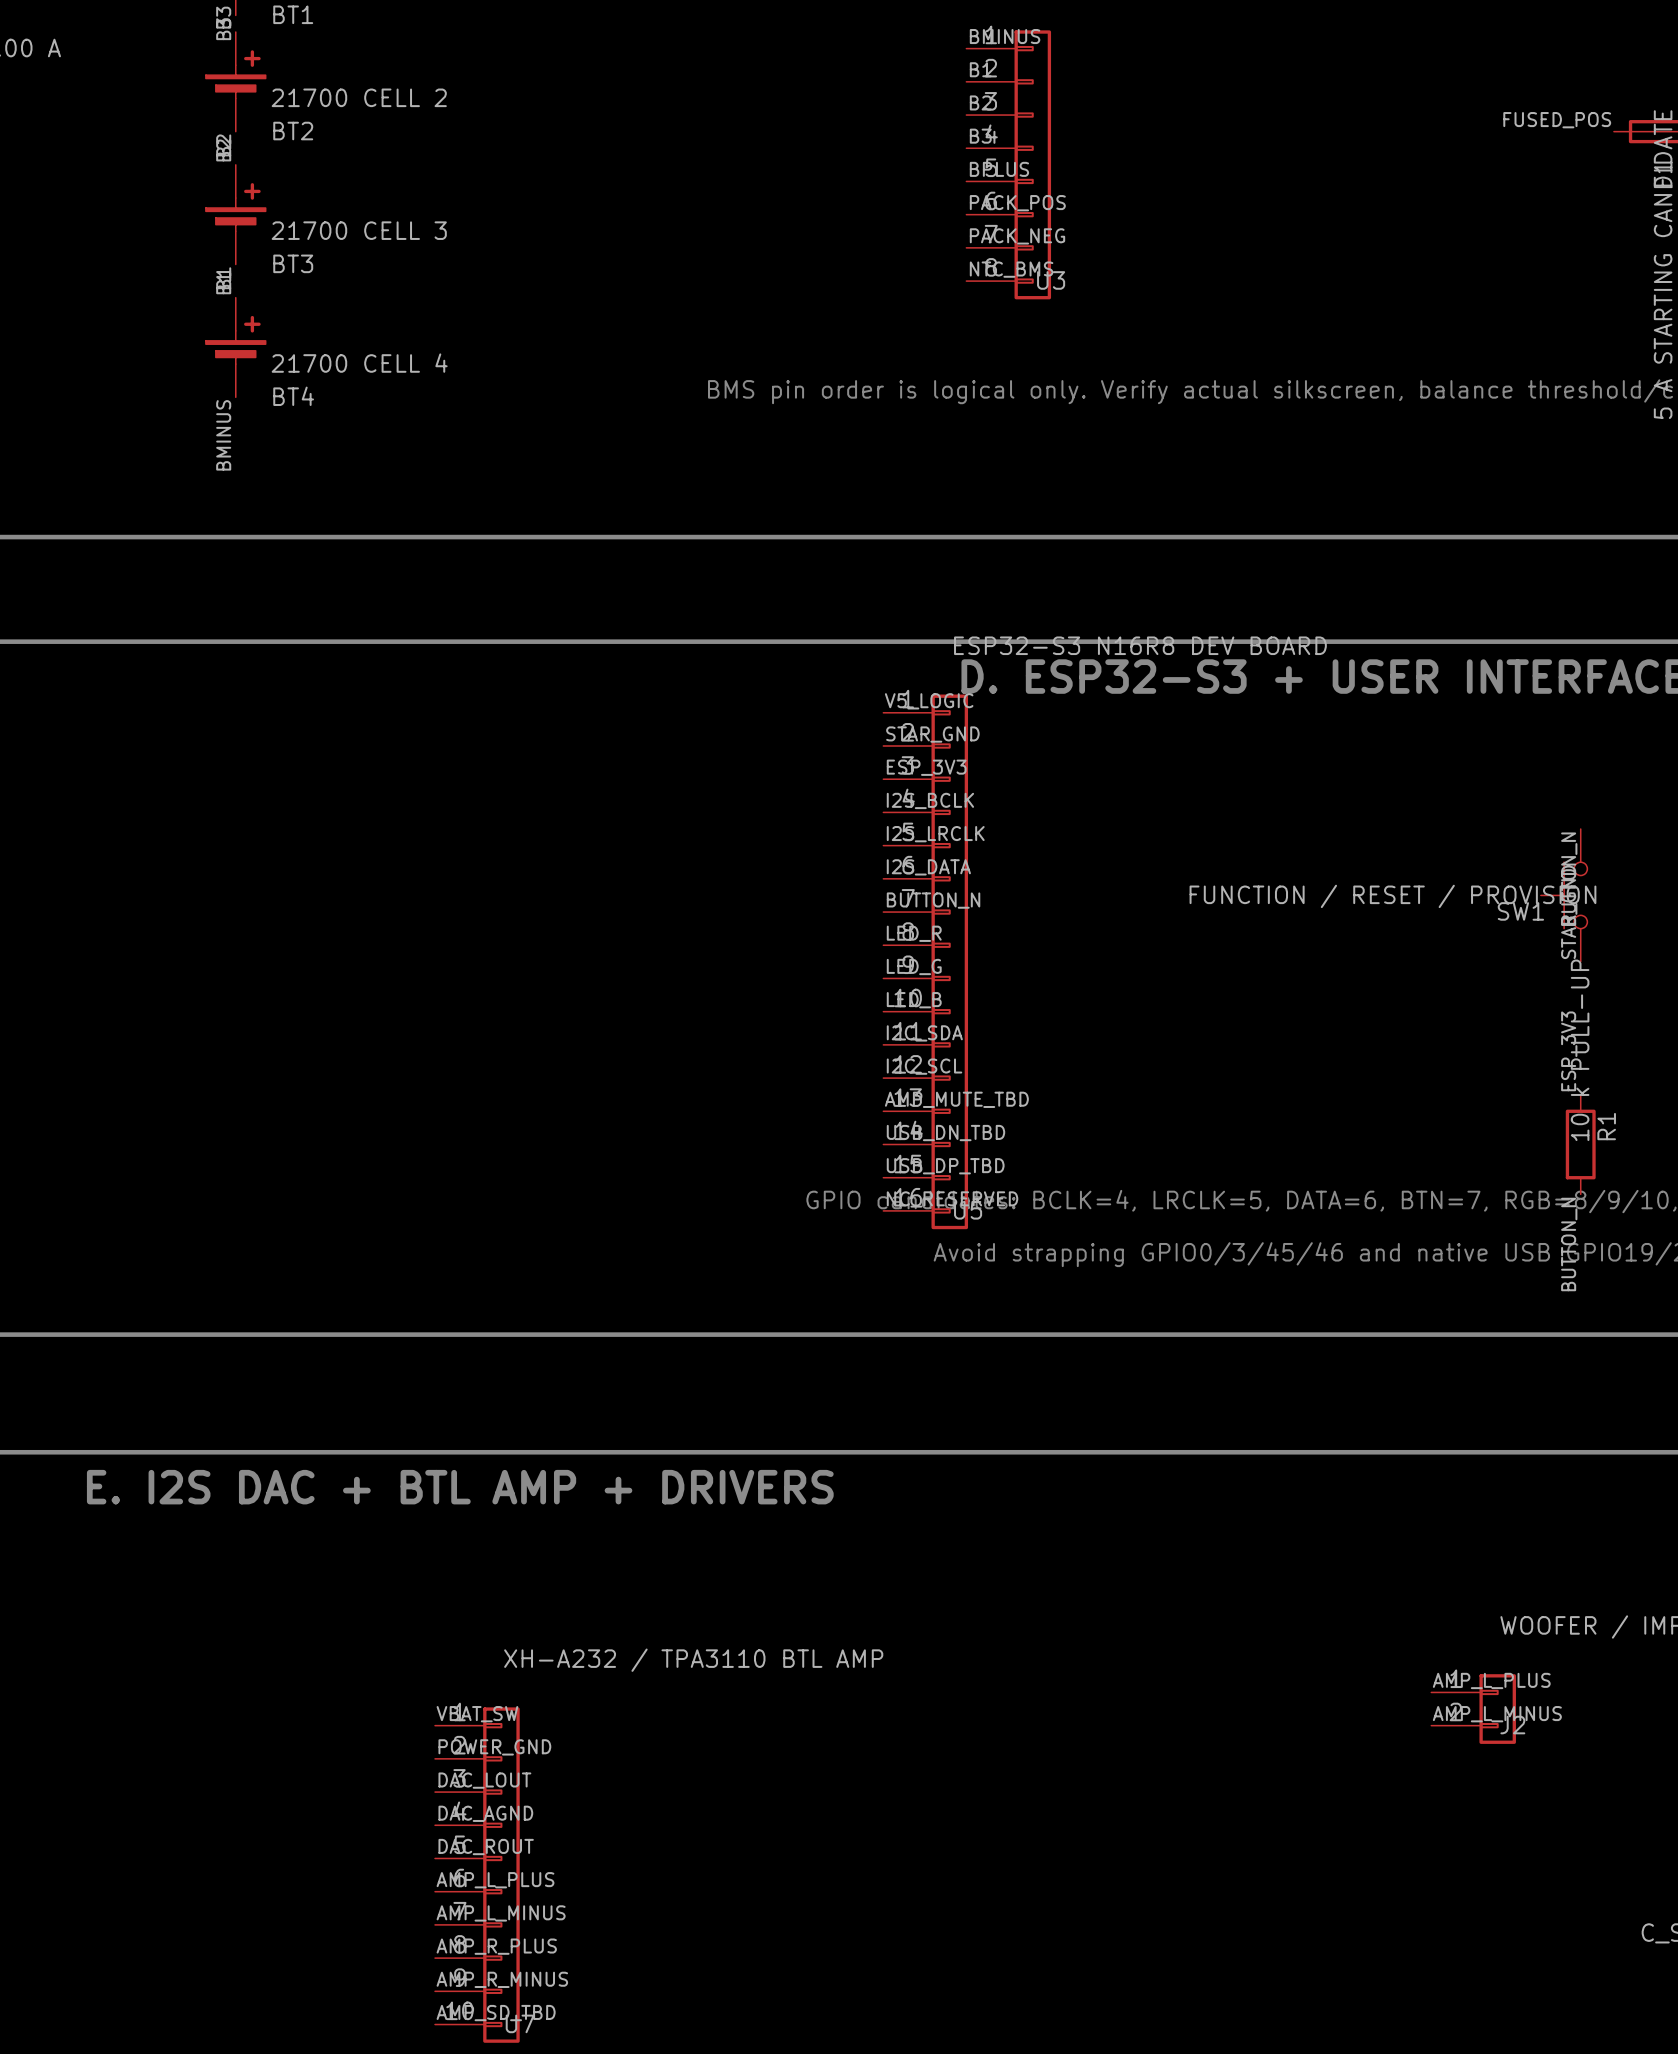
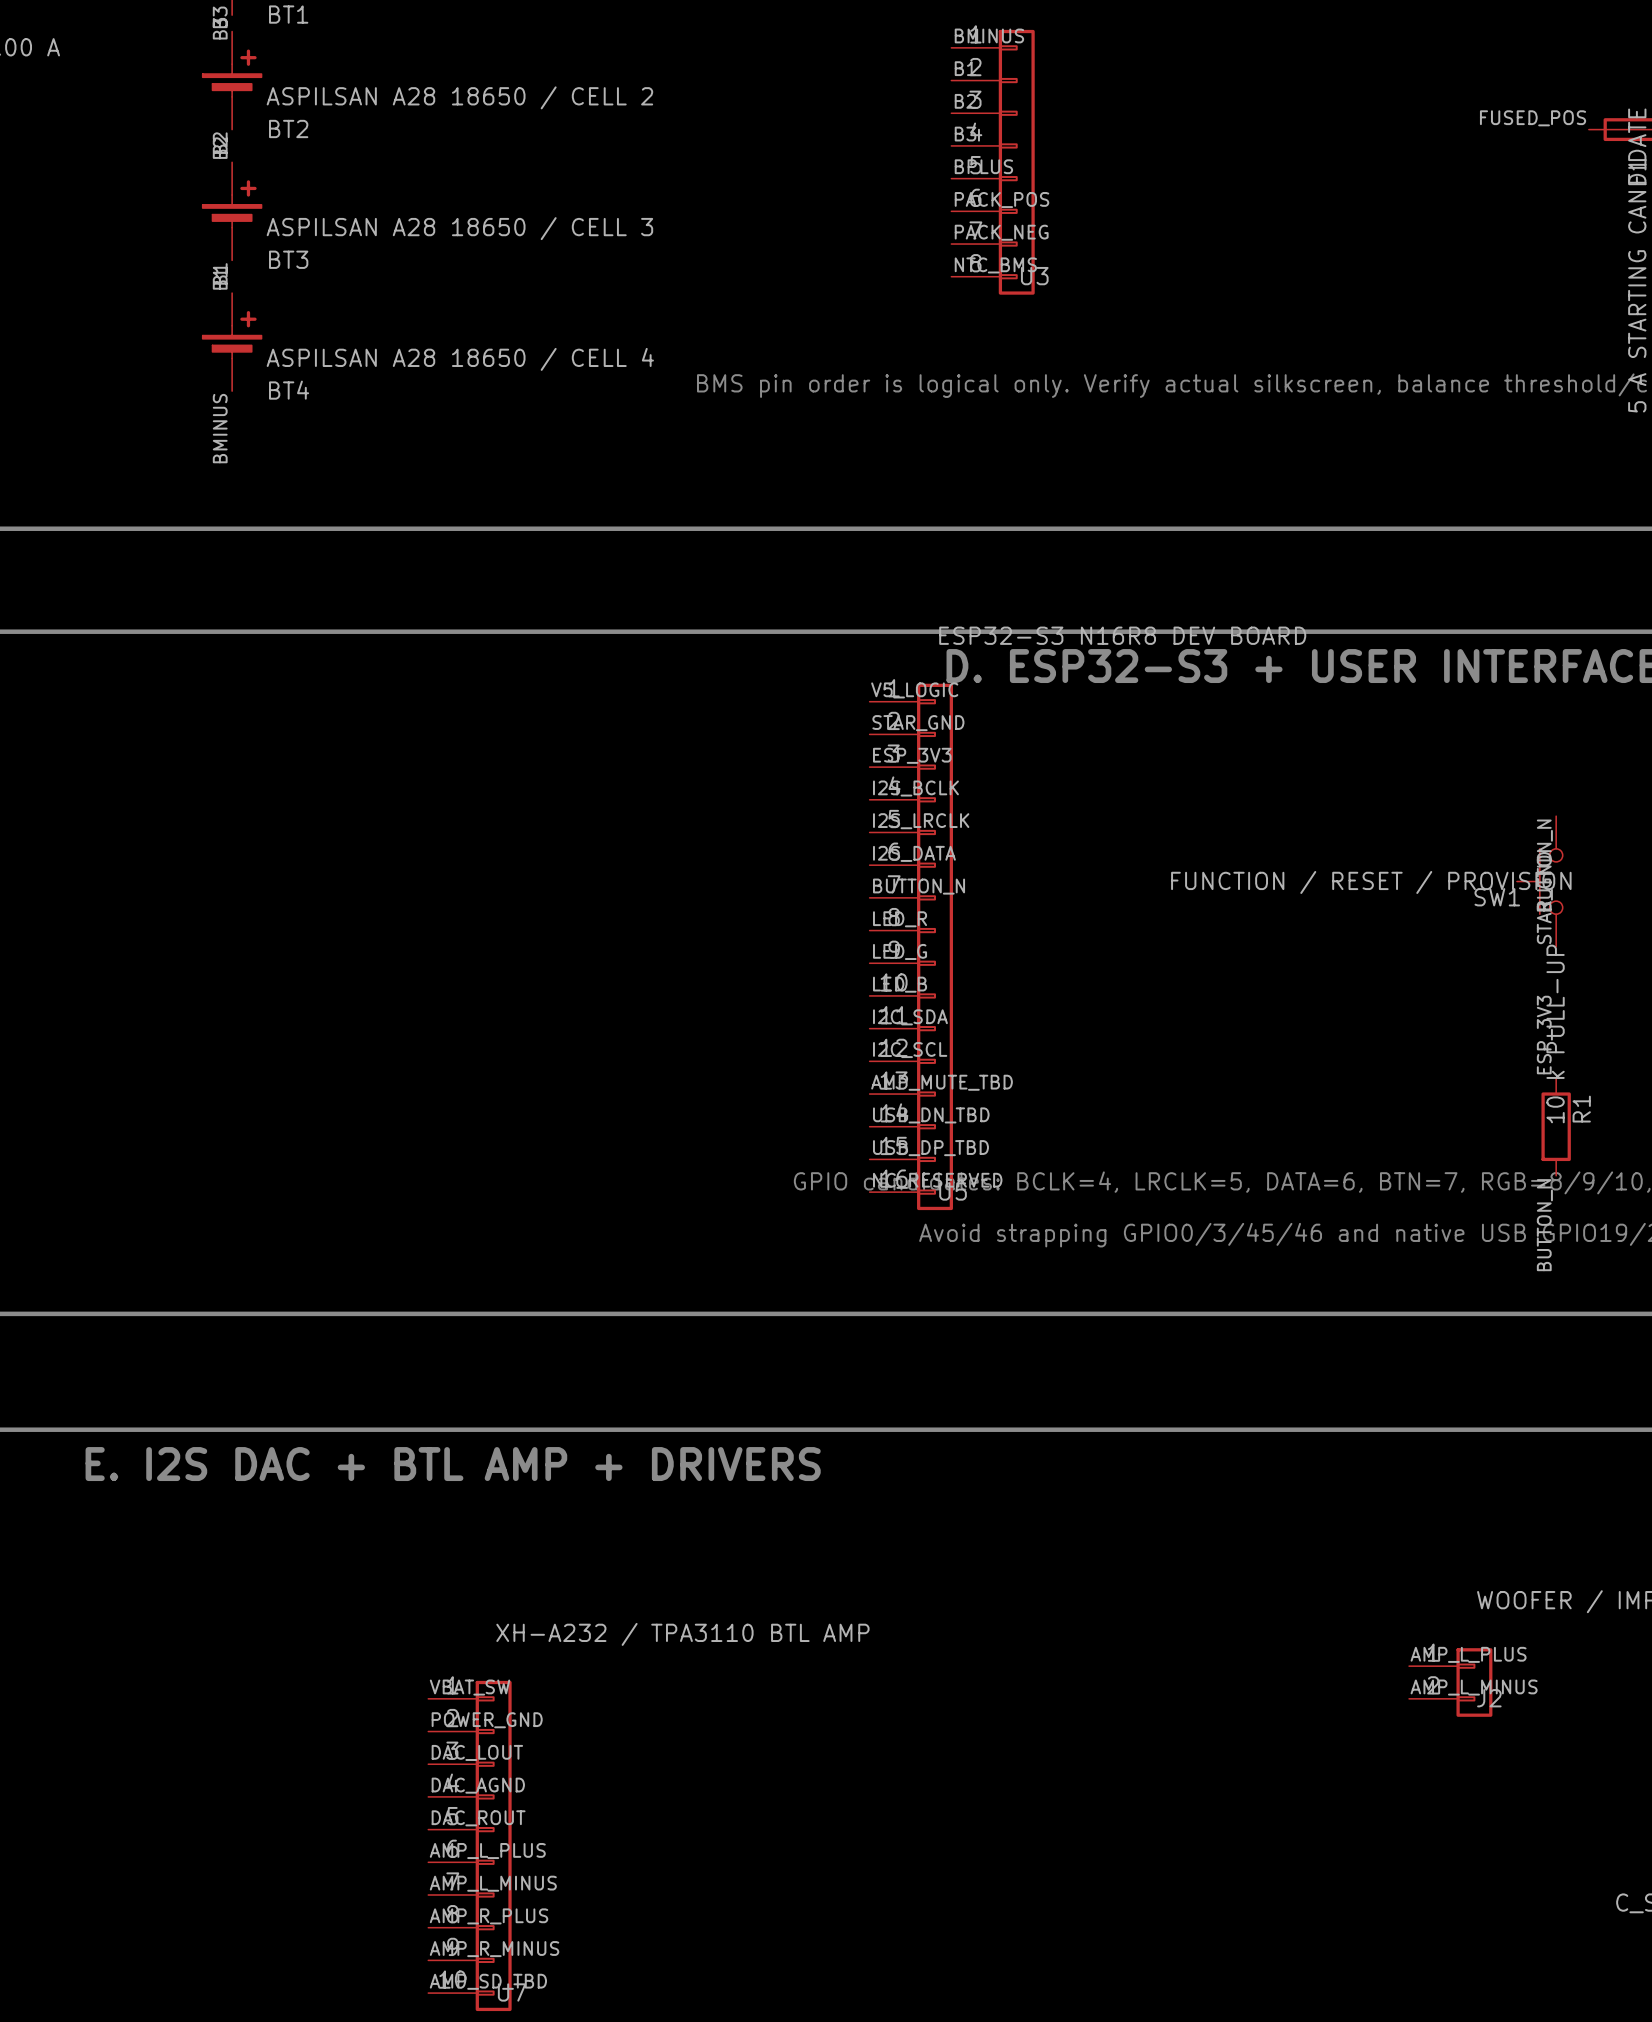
BT2 value: 21700 CELL 2 (359, 97) -> ASPILSAN A28 18650 / CELL 2 (459, 97)
BT3 value: 21700 CELL 3 (359, 230) -> ASPILSAN A28 18650 / CELL 3 (459, 228)
BT4 value: 21700 CELL 4 (359, 363) -> ASPILSAN A28 18650 / CELL 4 (460, 359)

